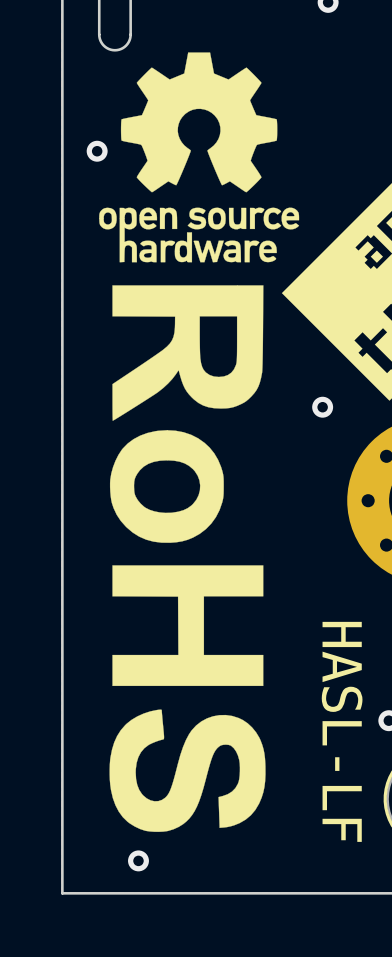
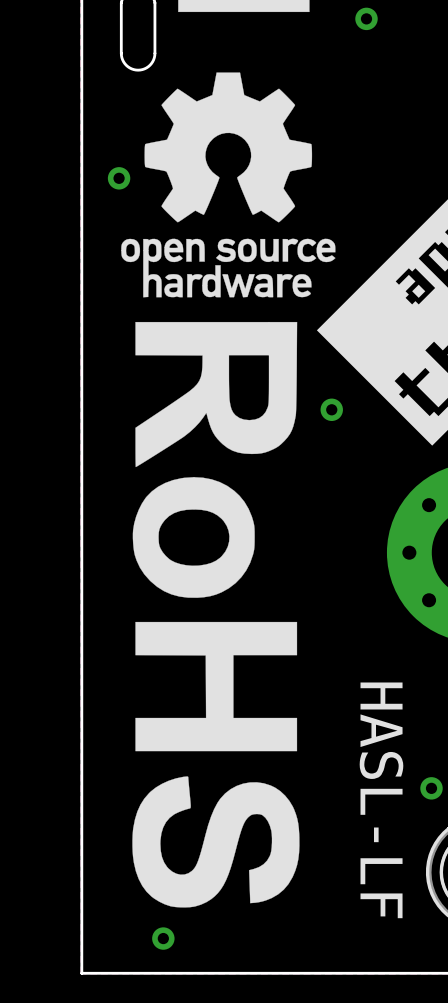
via position: (322, 407) -> (331, 409)

